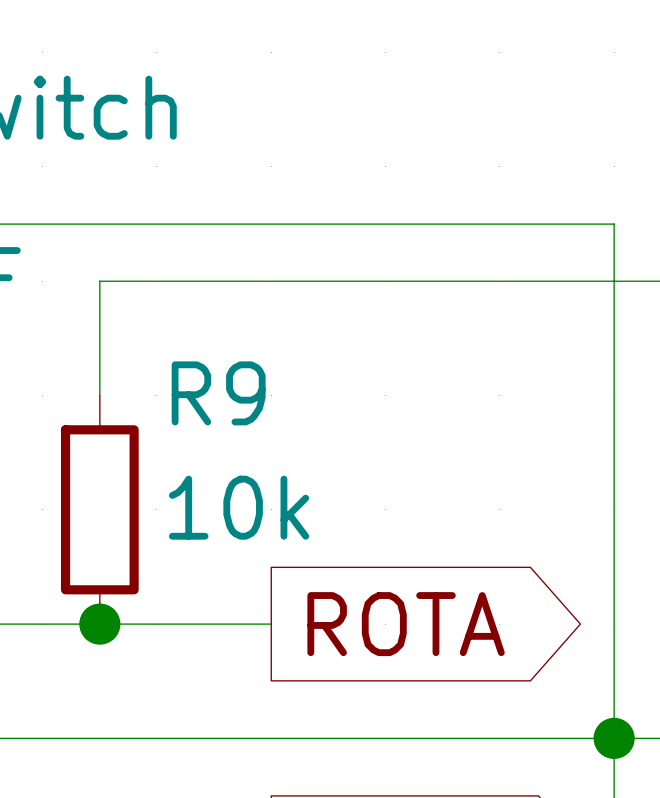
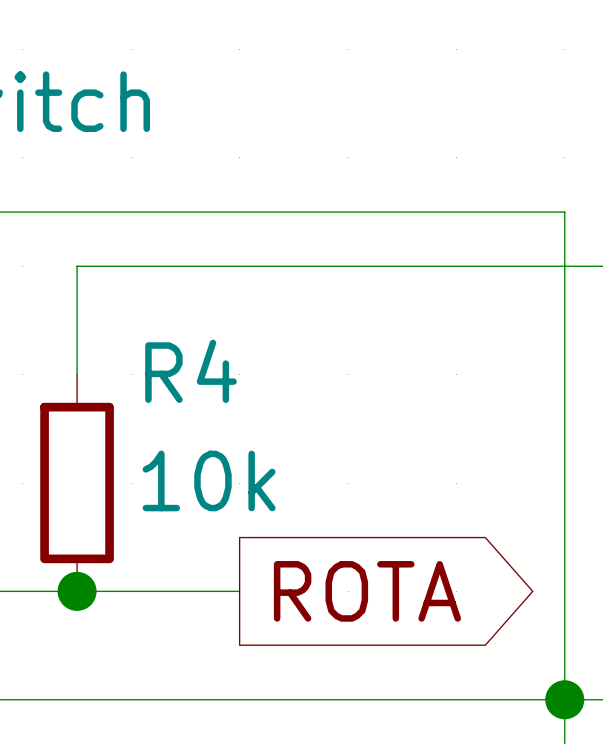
R9 name: R9 (218, 393) -> R4 (191, 371)

